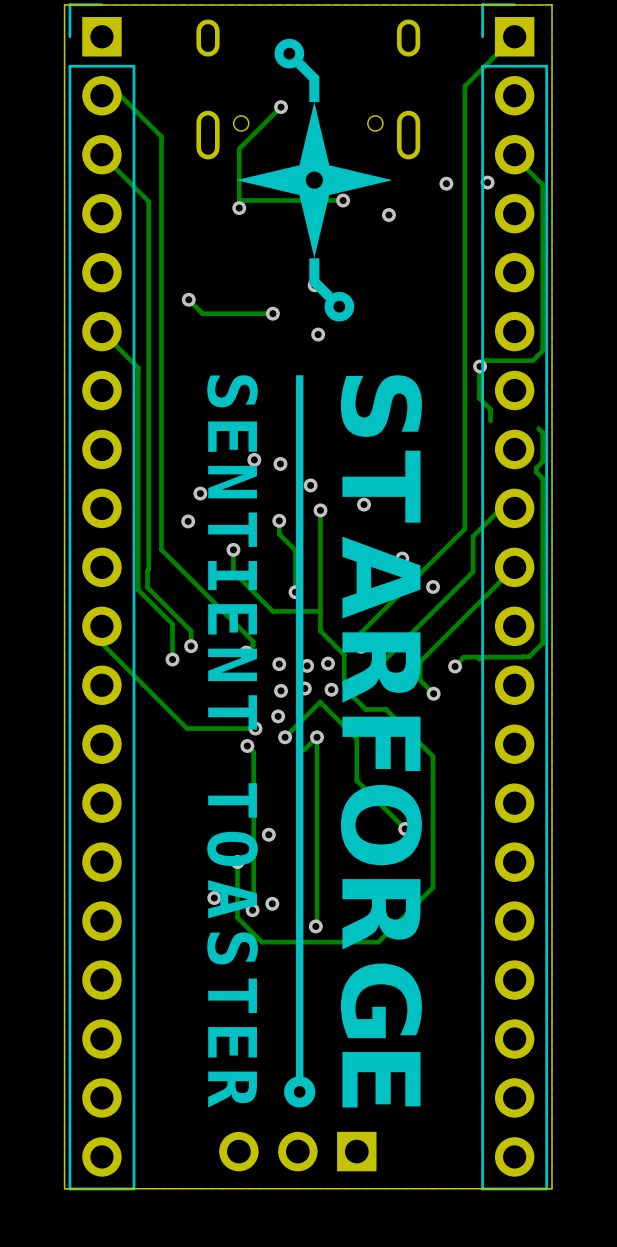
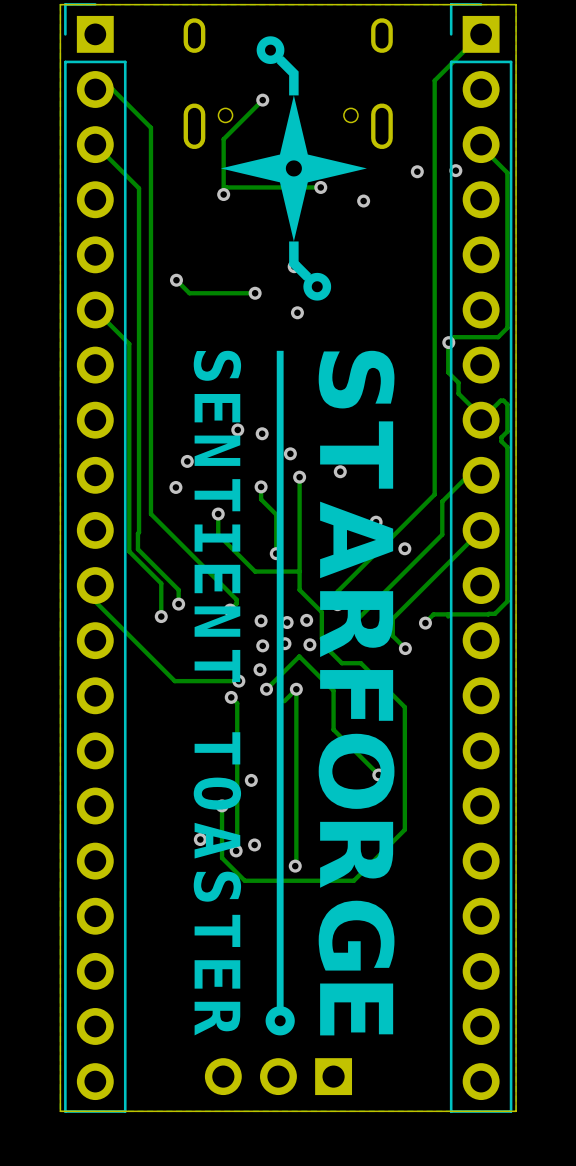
track: none -> (458, 393) (481, 416) (481, 420) (500, 400) (503, 400)

